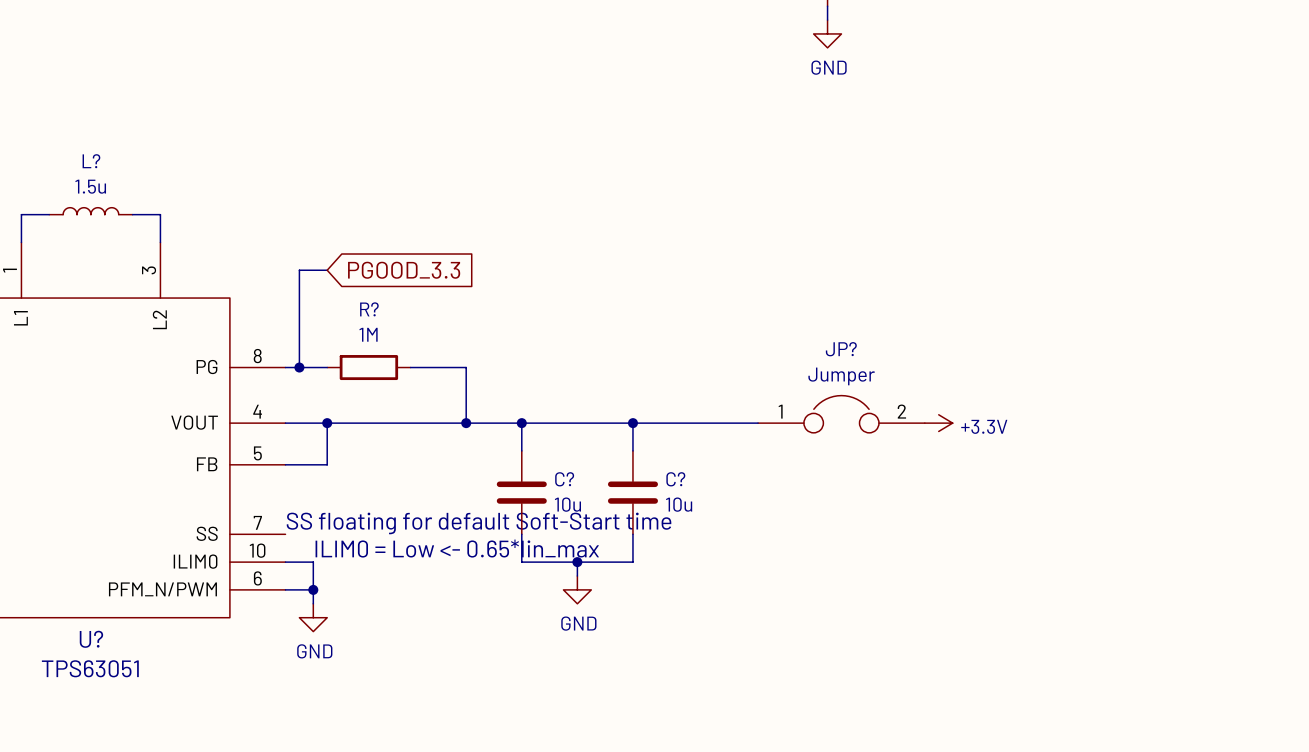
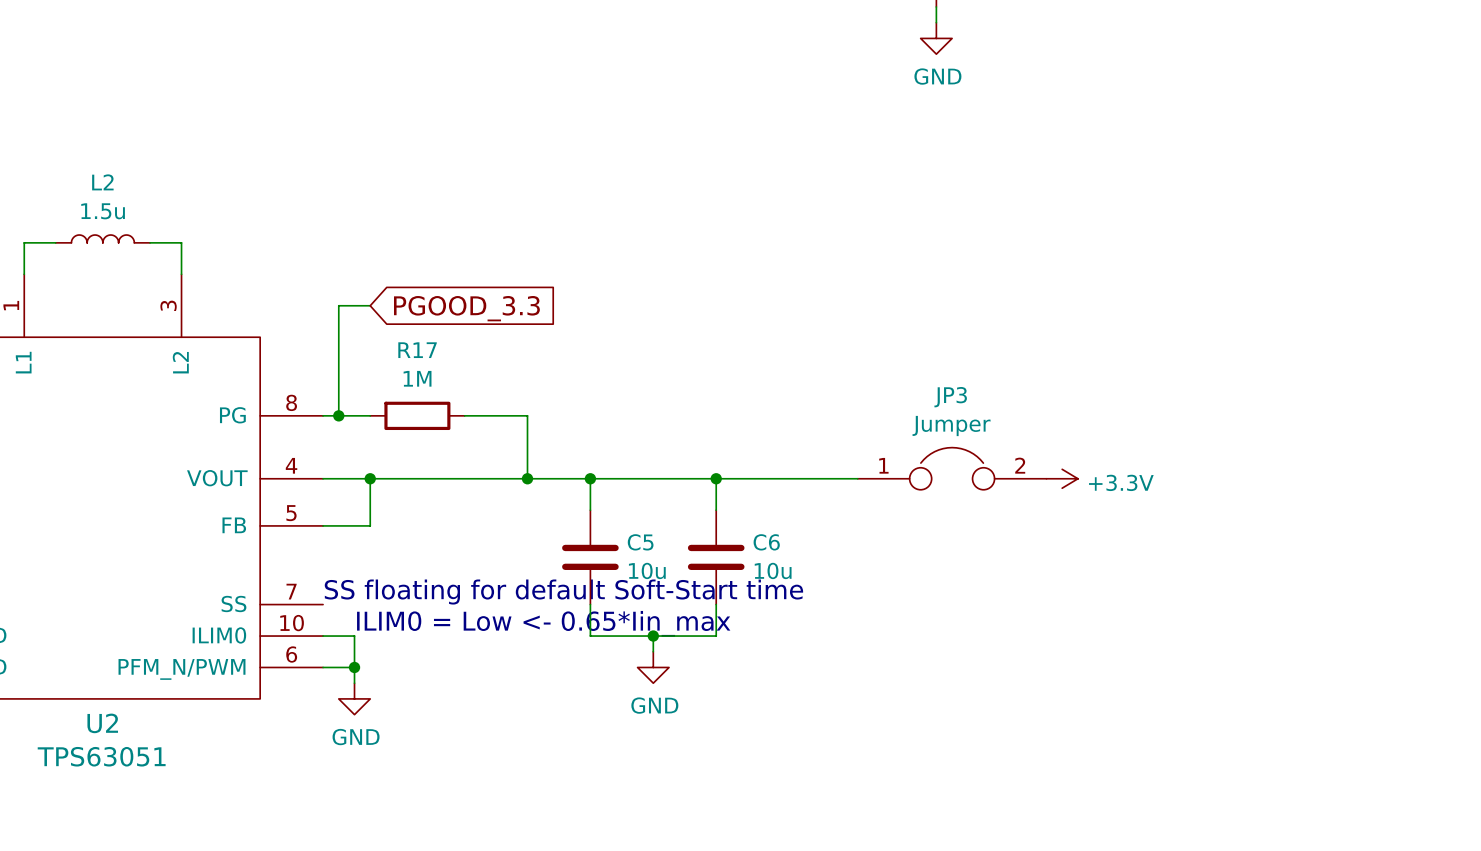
L? name: L? (91, 161) -> L2 (102, 182)
R? name: R? (369, 309) -> R17 (417, 350)
JP? name: JP? (841, 349) -> JP3 (950, 397)
C? name: C? (564, 479) -> C5 (640, 542)
C? name: C? (675, 479) -> C6 (766, 542)
U? name: U? (91, 639) -> U2 (102, 723)

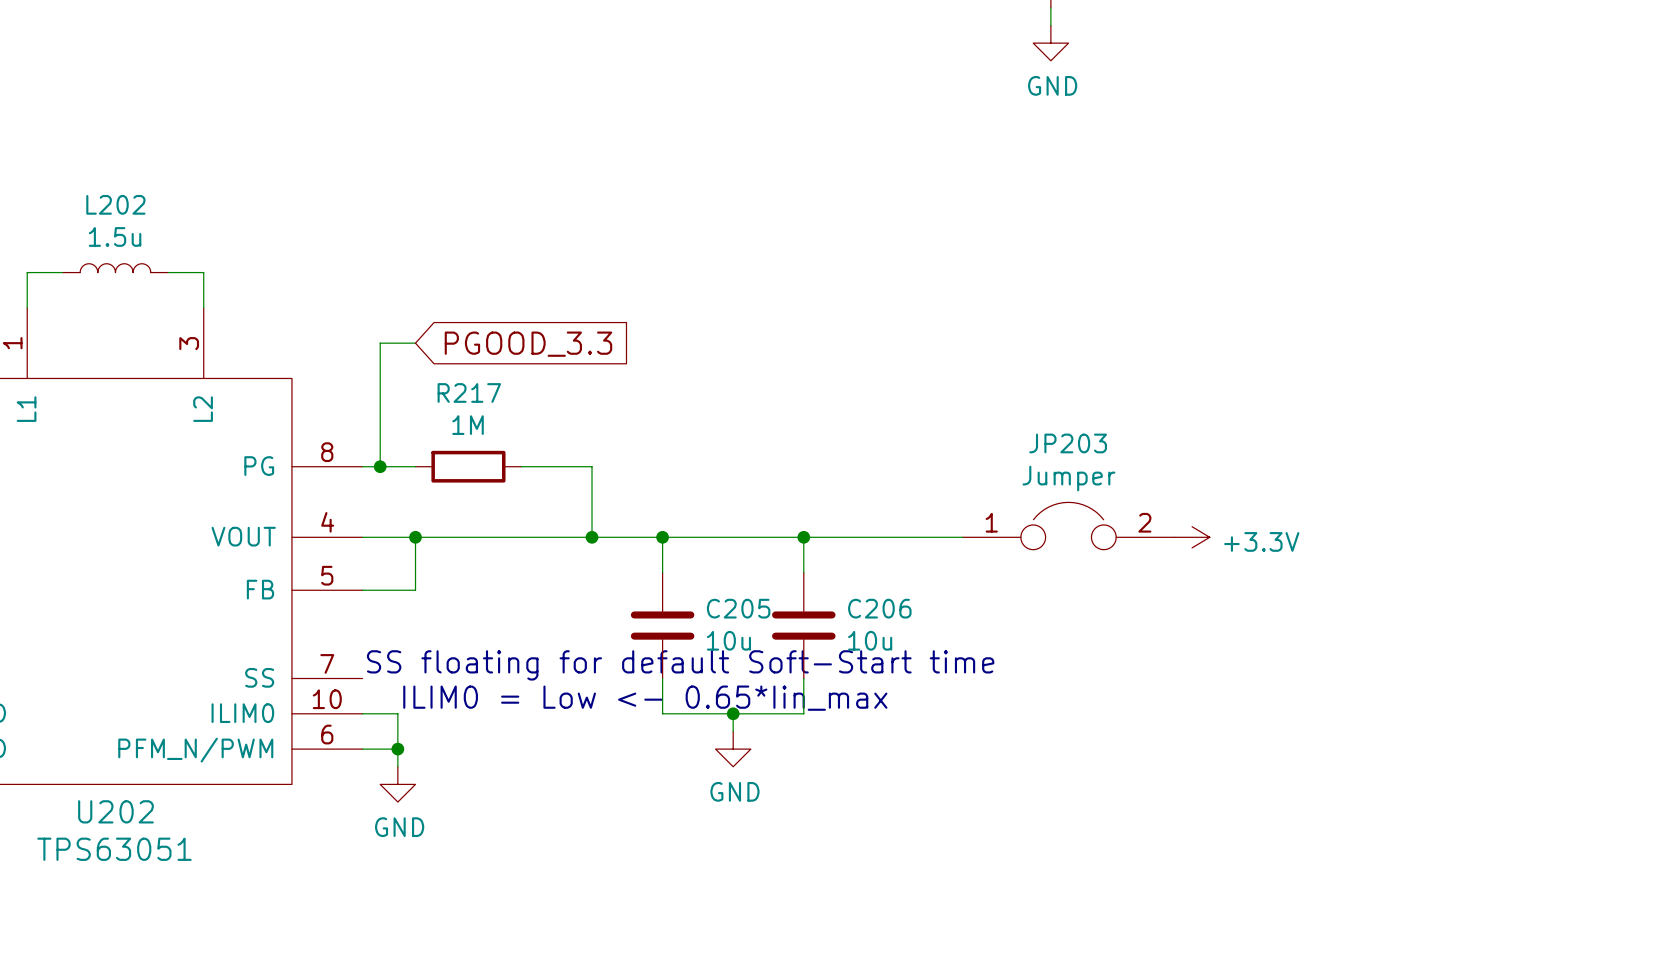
L2 name: L2 (102, 182) -> L202 (115, 204)
R17 name: R17 (417, 350) -> R217 (469, 392)
JP3 name: JP3 (950, 397) -> JP203 (1068, 443)
C5 name: C5 (640, 542) -> C205 (738, 608)
C6 name: C6 (766, 542) -> C206 (879, 608)
U2 name: U2 (102, 723) -> U202 (115, 811)

